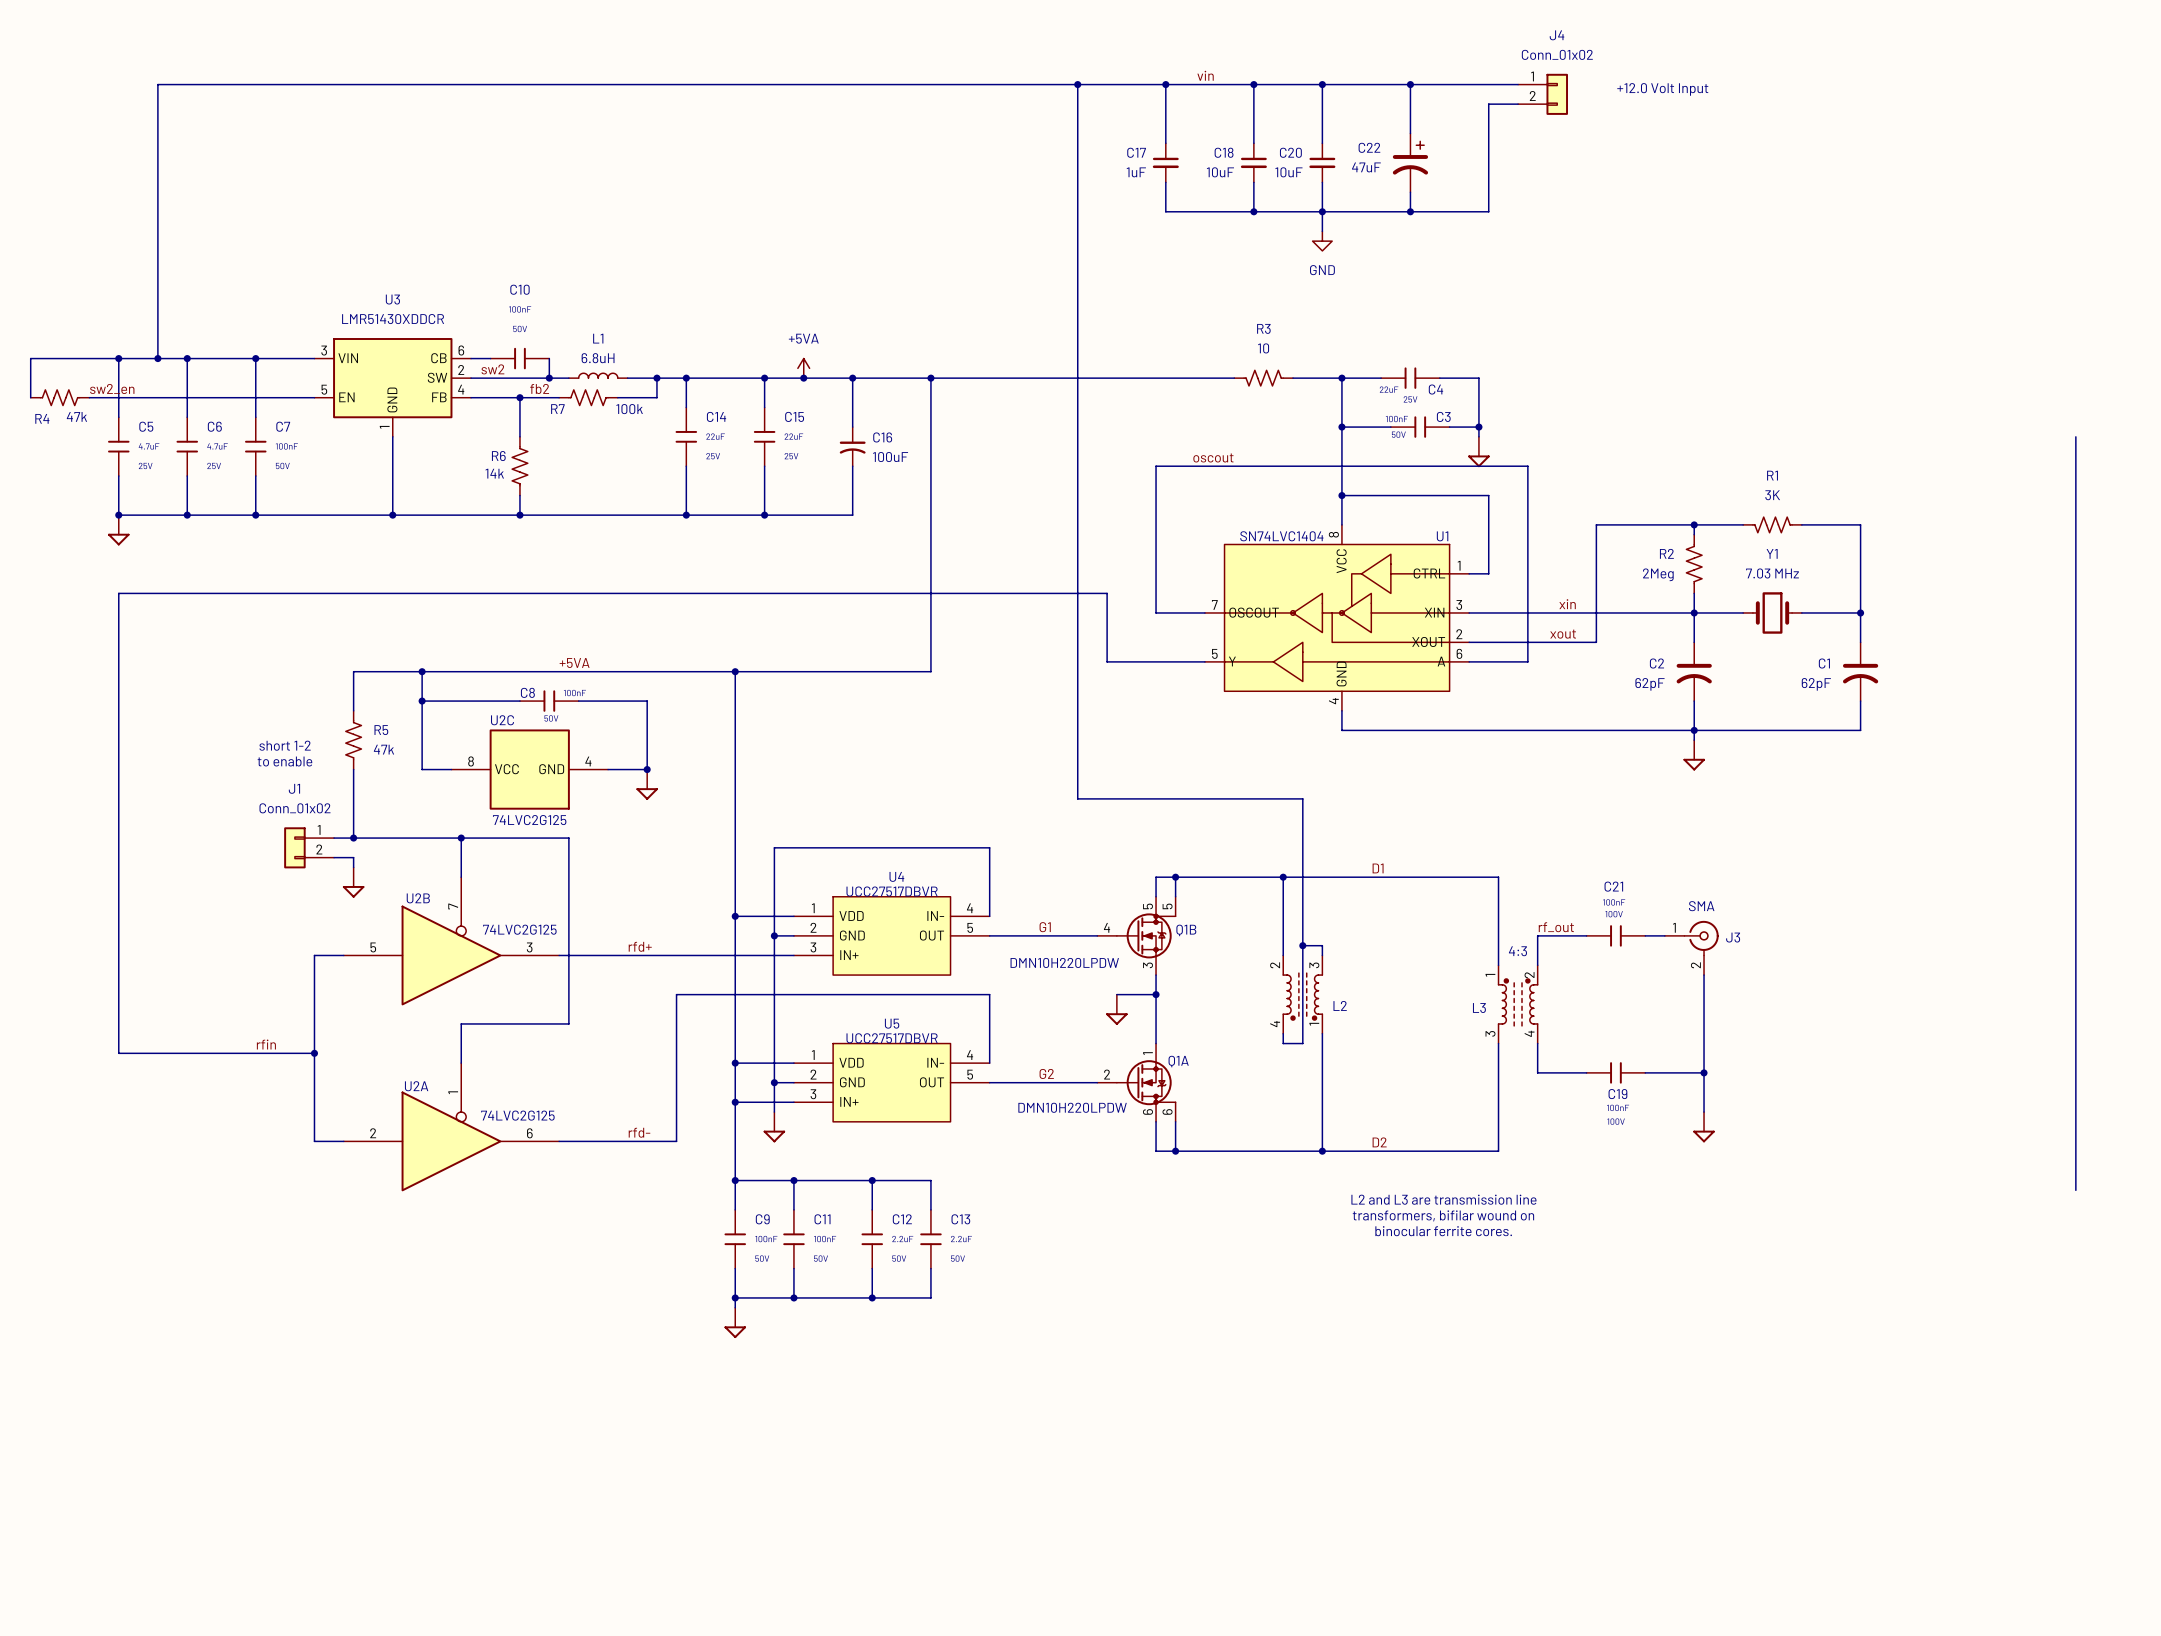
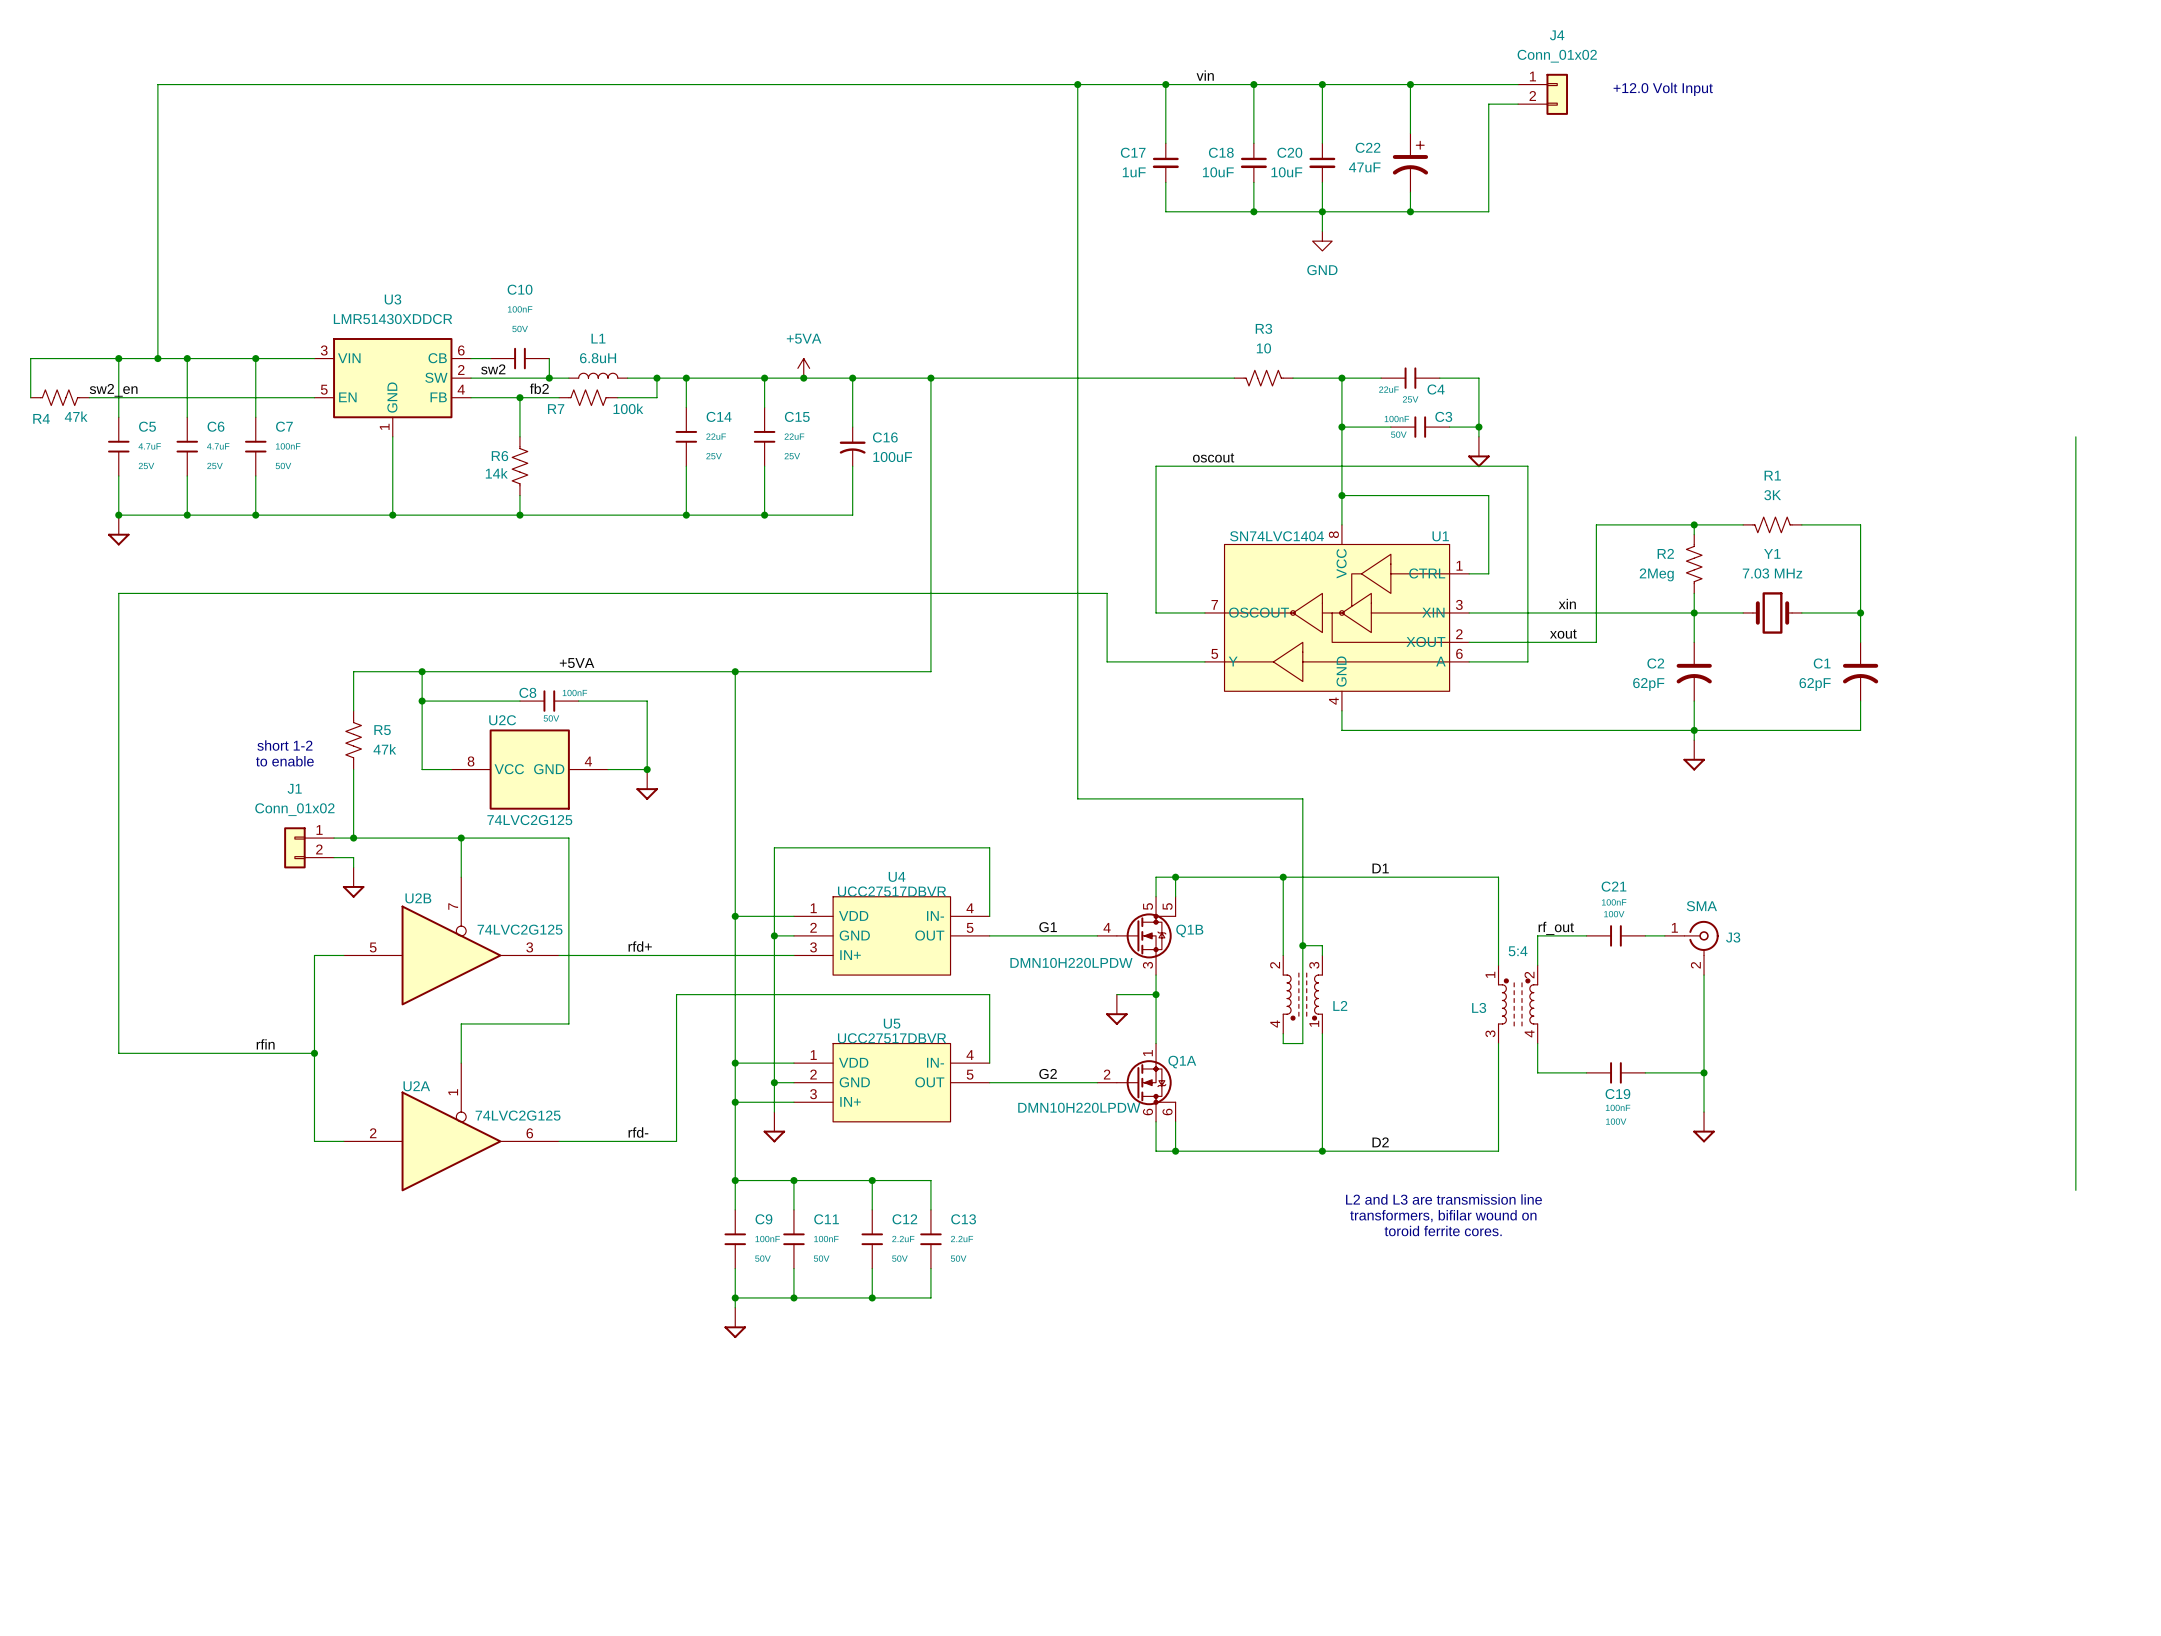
L3 value: 4:3 (1517, 951) -> 5:4 (1518, 951)
text: binocular ferrite cores. (1443, 1231) -> toroid ferrite cores. (1443, 1231)

